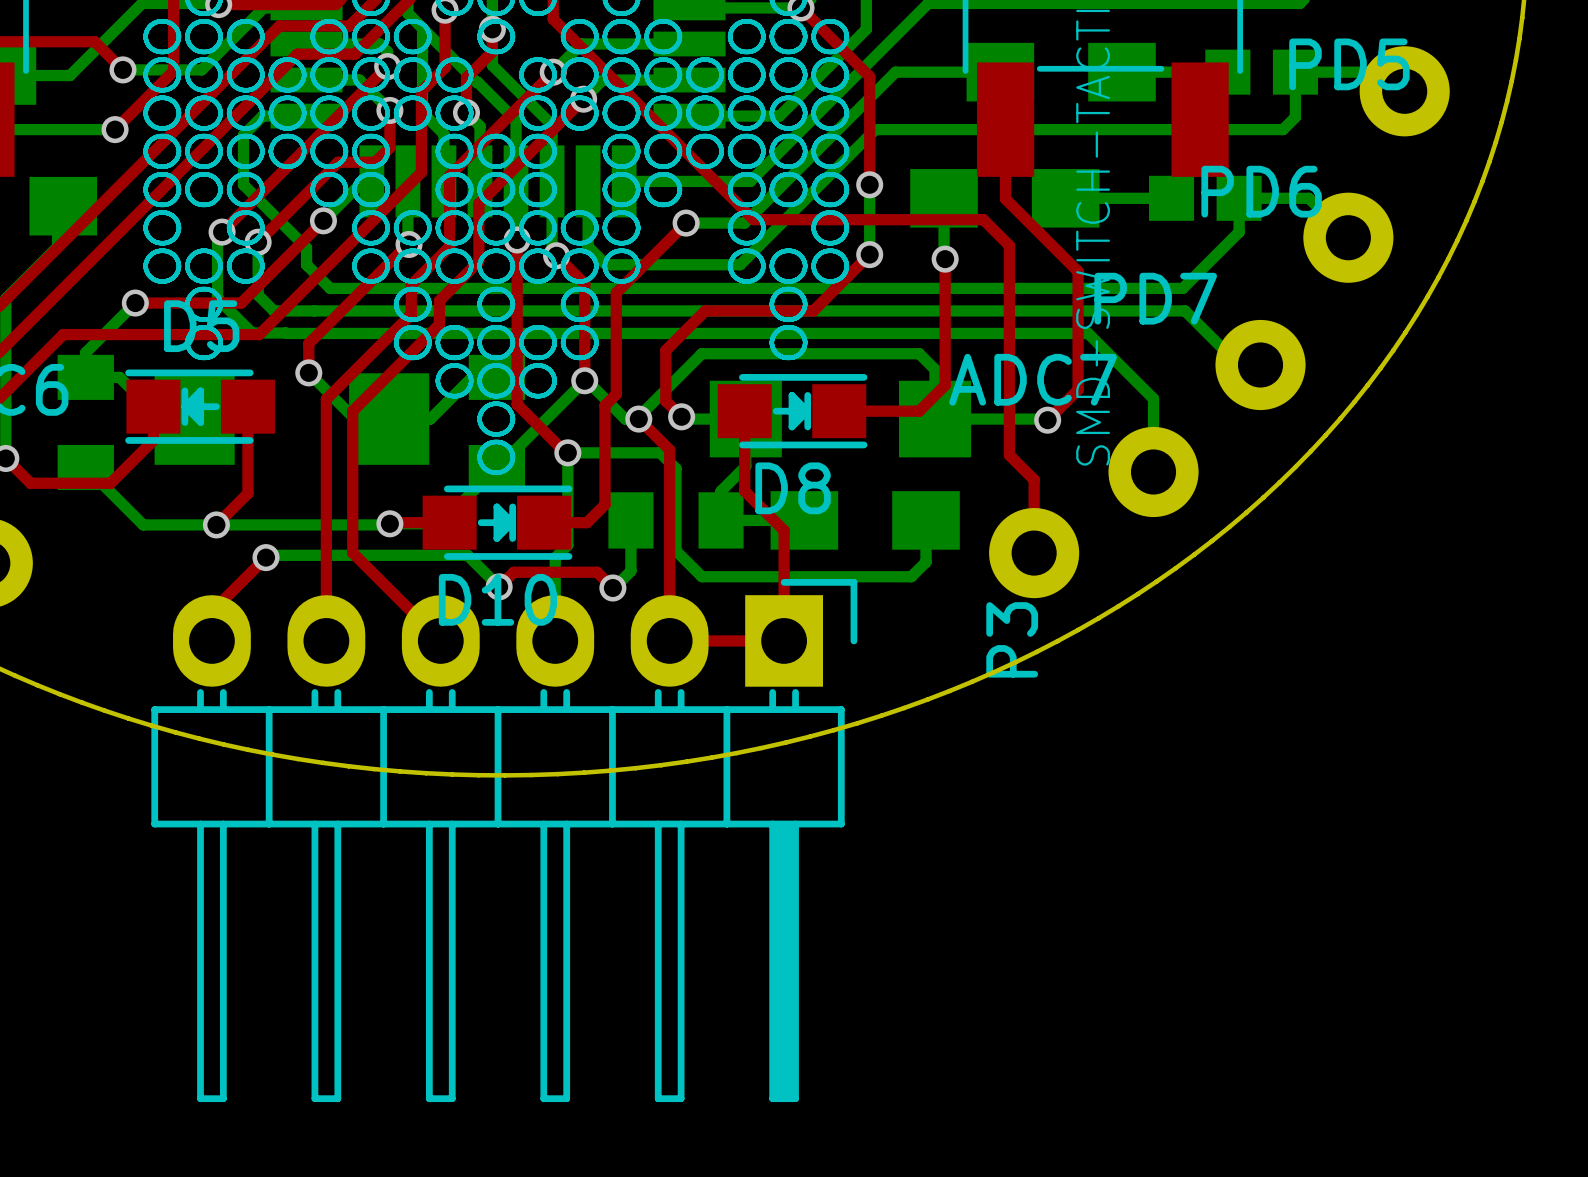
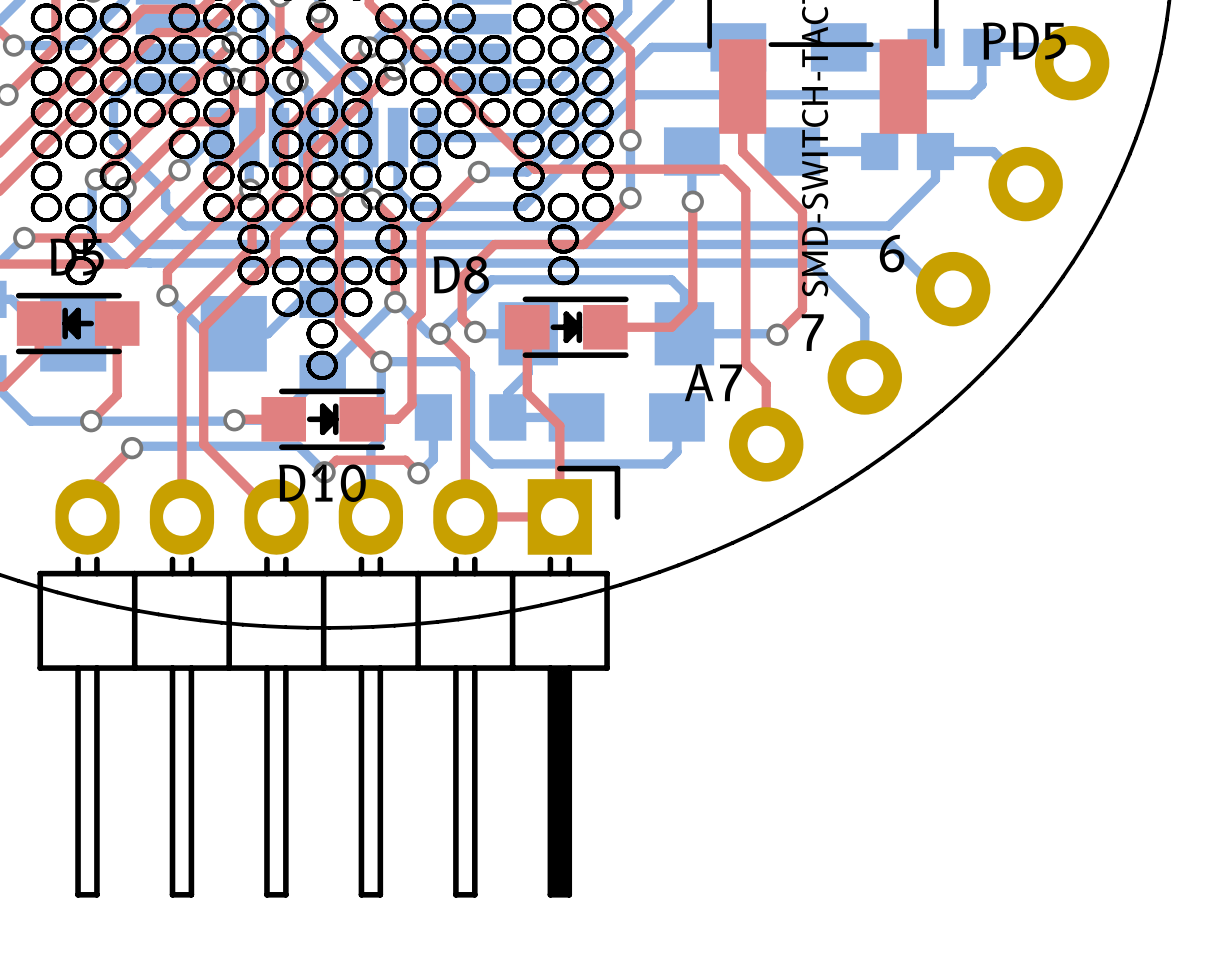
PD6 name: PD6 (1261, 191) -> 6 (892, 253)
PD7 name: PD7 (1155, 298) -> 7 (812, 332)
ADC7 name: ADC7 (1033, 379) -> A7 (713, 382)
D8 name position: D8 (793, 488) -> D8 (461, 274)
P3 name: P3 (1012, 639) -> none

